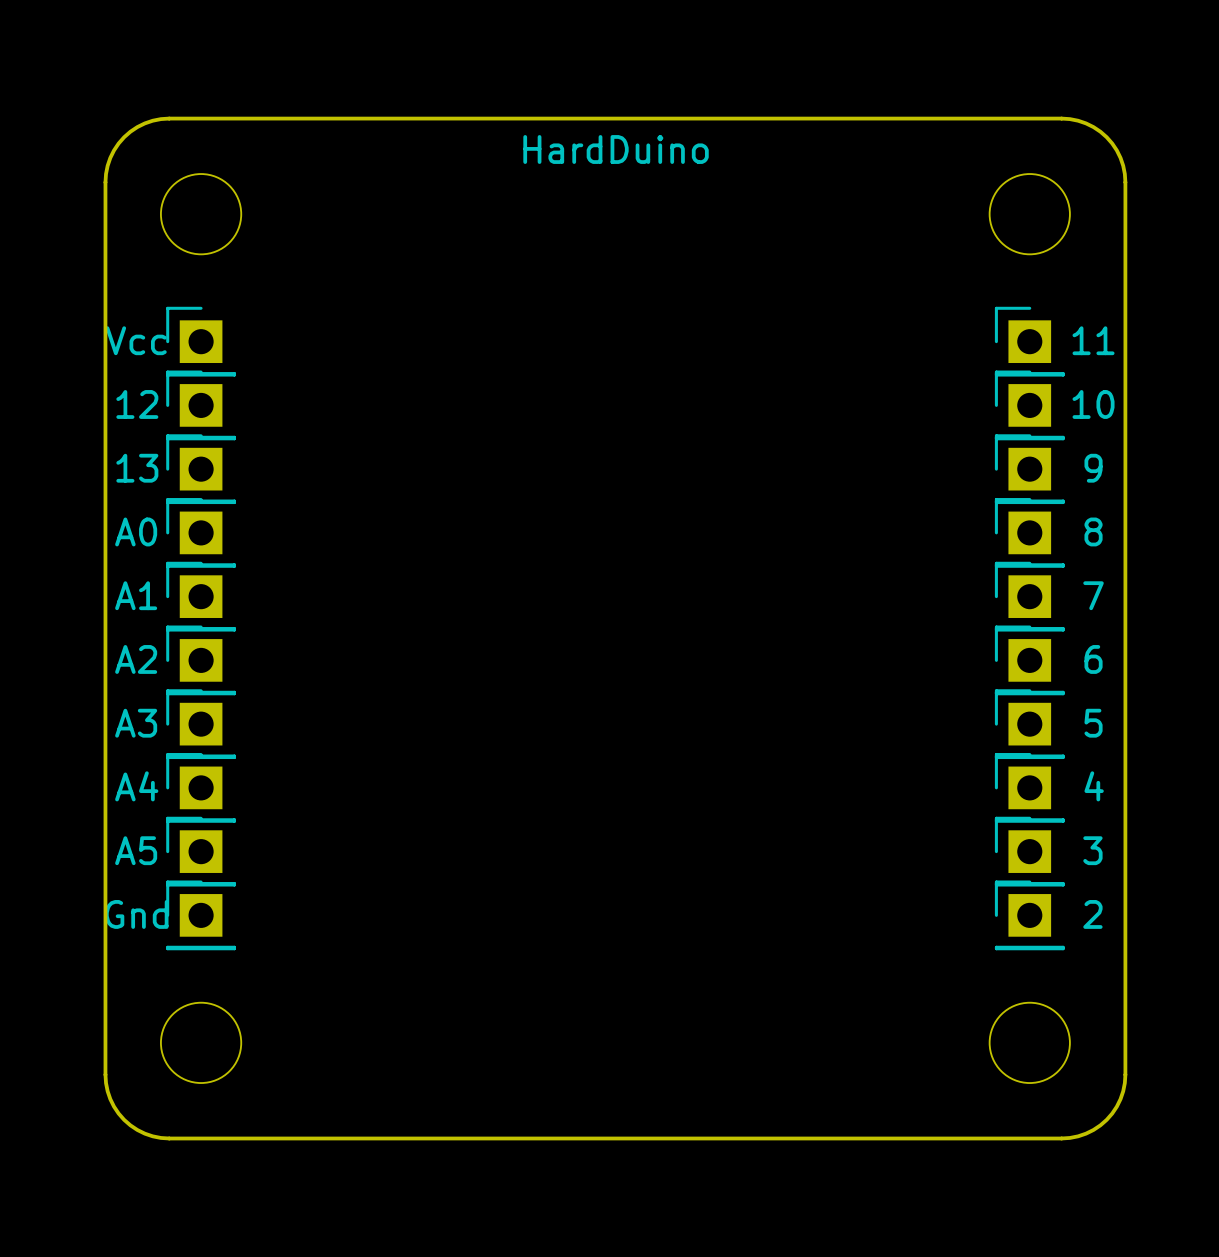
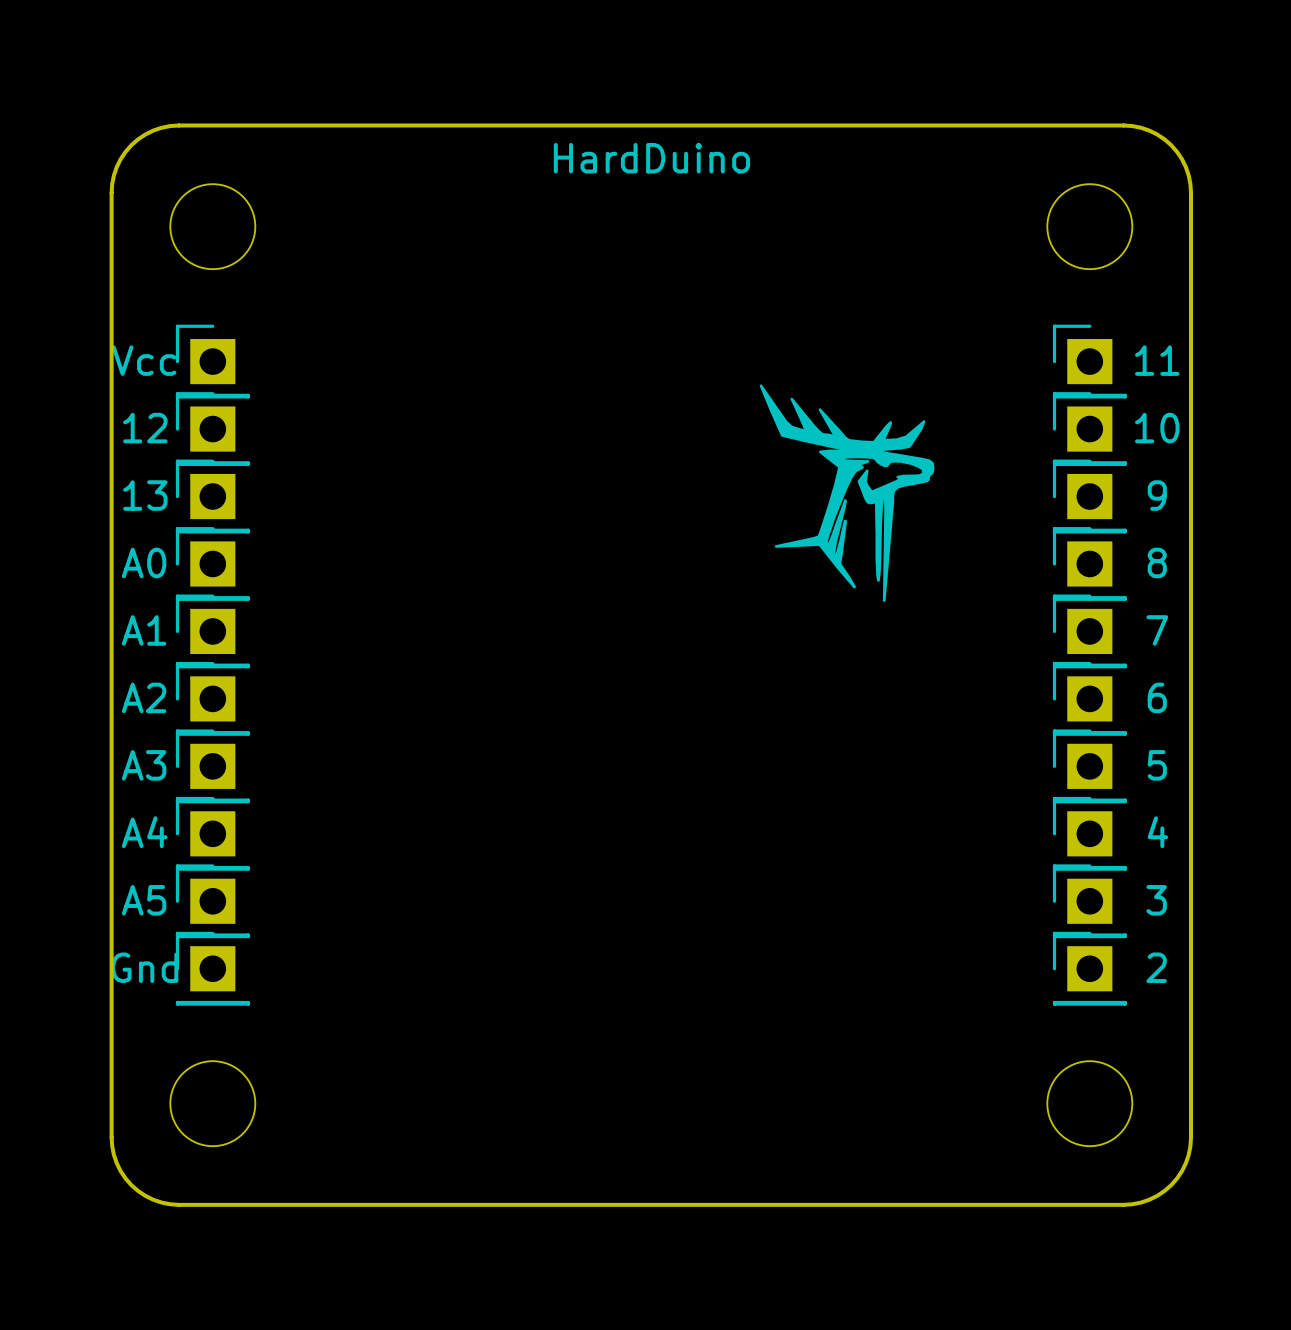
drawing: none -> [759, 384, 935, 602]

